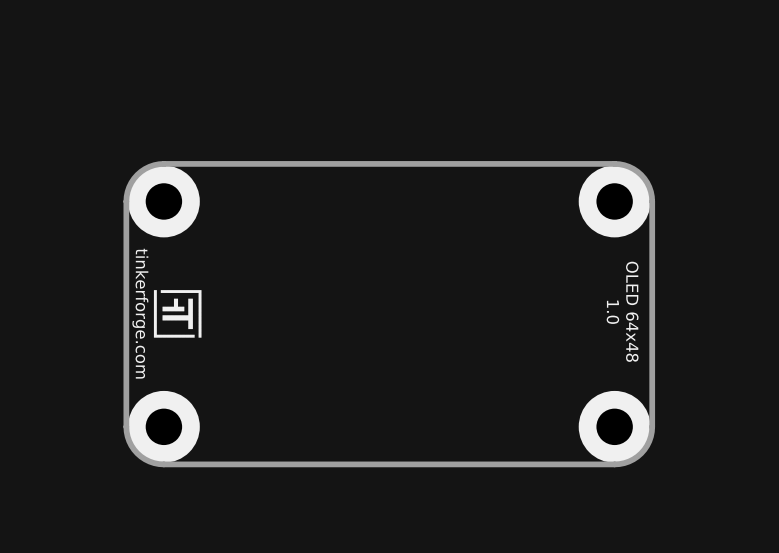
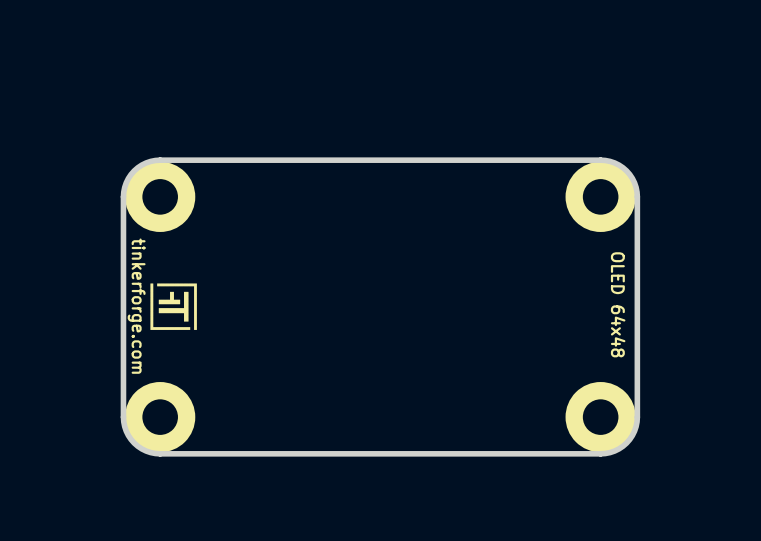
text: 1.0 (612, 312) -> none

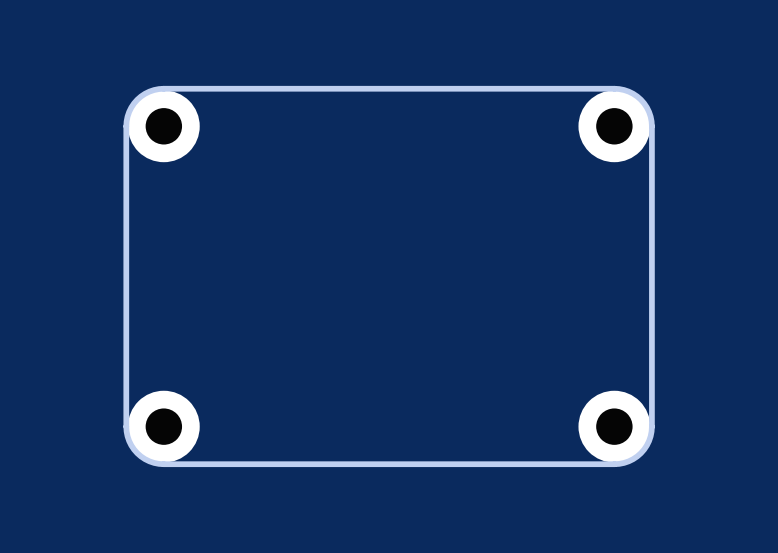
part position: (160, 196) -> (163, 126)
part position: (600, 196) -> (614, 126)
board edge: (637, 196) (634, 182) (626, 170) (614, 162) (600, 160) (155, 160) (141, 165) (131, 174) (124, 187) (123, 196) -> (651, 201) (650, 116) (646, 107) (637, 96) (628, 91) (614, 88) (154, 90) (137, 99) (127, 116) (126, 201)
drawing: [150, 283, 197, 330] -> none
text: OLED 64x48 (618, 304) -> none
text: tinkerforge.com (136, 306) -> none

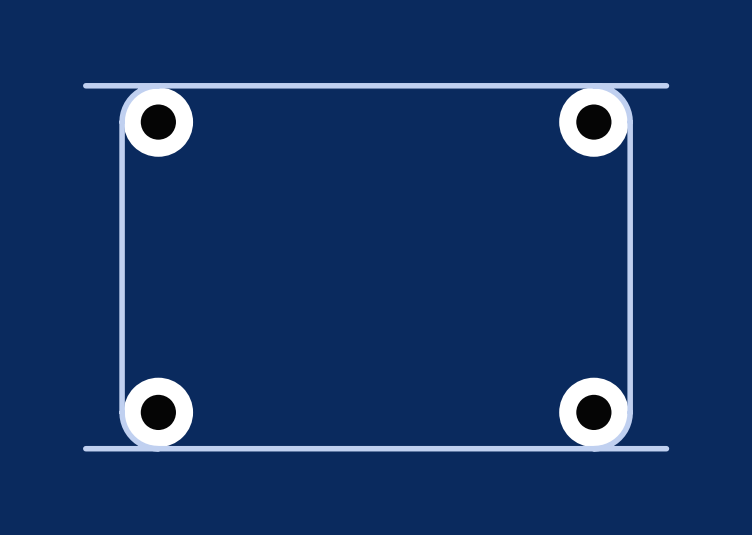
board edge: none -> (158, 85) (85, 85)
board edge: none -> (666, 85) (593, 85)
board edge: none -> (158, 448) (85, 448)
board edge: none -> (666, 448) (593, 448)

